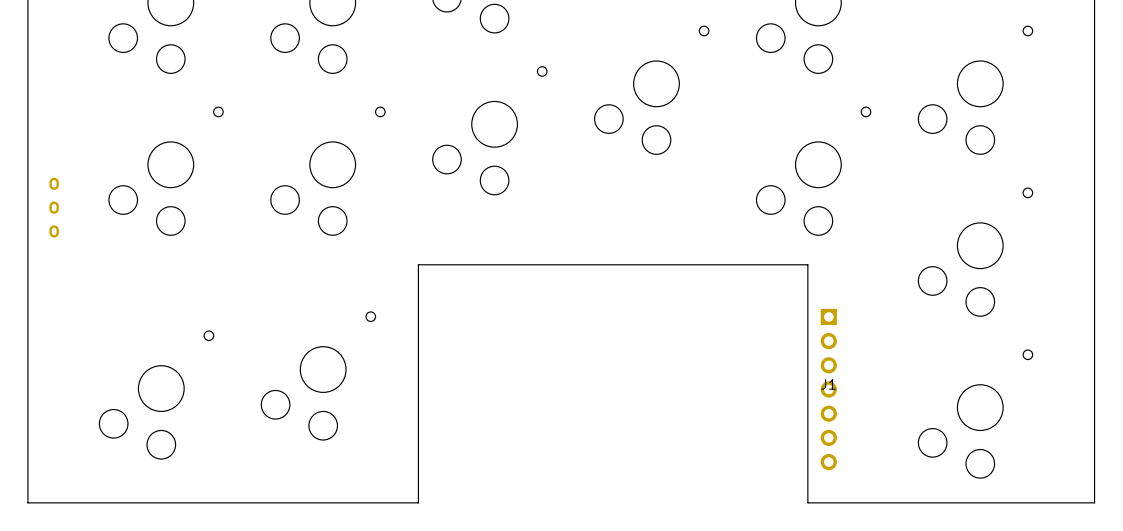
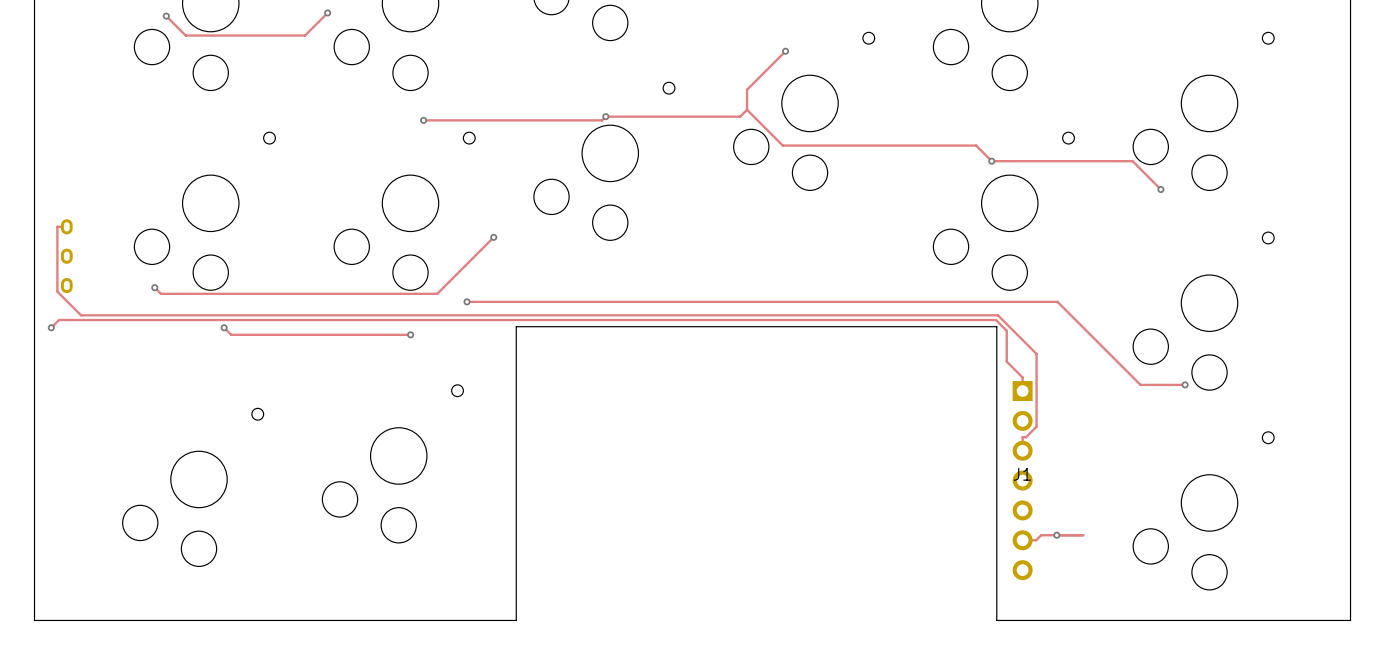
track: none -> (327, 12) (305, 35) (185, 35) (166, 16)
via: none -> (327, 12)
via: none -> (166, 16)
track: none -> (785, 51) (747, 89) (747, 109)
via: none -> (785, 51)
track: none -> (747, 109) (782, 145) (976, 145) (991, 161) (1132, 161) (1160, 189)
track: none -> (747, 109) (740, 116) (605, 116) (602, 120) (423, 120)
via: none -> (605, 116)
via: none -> (423, 120)
via: none -> (991, 161)
via: none -> (1160, 189)
track: none -> (66, 226) (57, 226) (57, 291) (81, 315) (997, 315) (1036, 353) (1036, 426) (1026, 437) (1022, 437) (1022, 450)
track: none -> (493, 237) (437, 293) (160, 293) (154, 287)
via: none -> (493, 237)
via: none -> (154, 287)
track: none -> (467, 301) (1057, 301) (1140, 384) (1185, 384)
via: none -> (467, 301)
track: none -> (51, 327) (59, 320) (995, 320) (1006, 330) (1006, 361) (1022, 377) (1022, 391)
via: none -> (51, 327)
track: none -> (224, 327) (231, 334) (410, 334)
via: none -> (224, 327)
via: none -> (410, 334)
via: none -> (1185, 384)
via: none -> (1056, 535)
track: none -> (1083, 535) (1041, 535) (1036, 540) (1022, 540)

